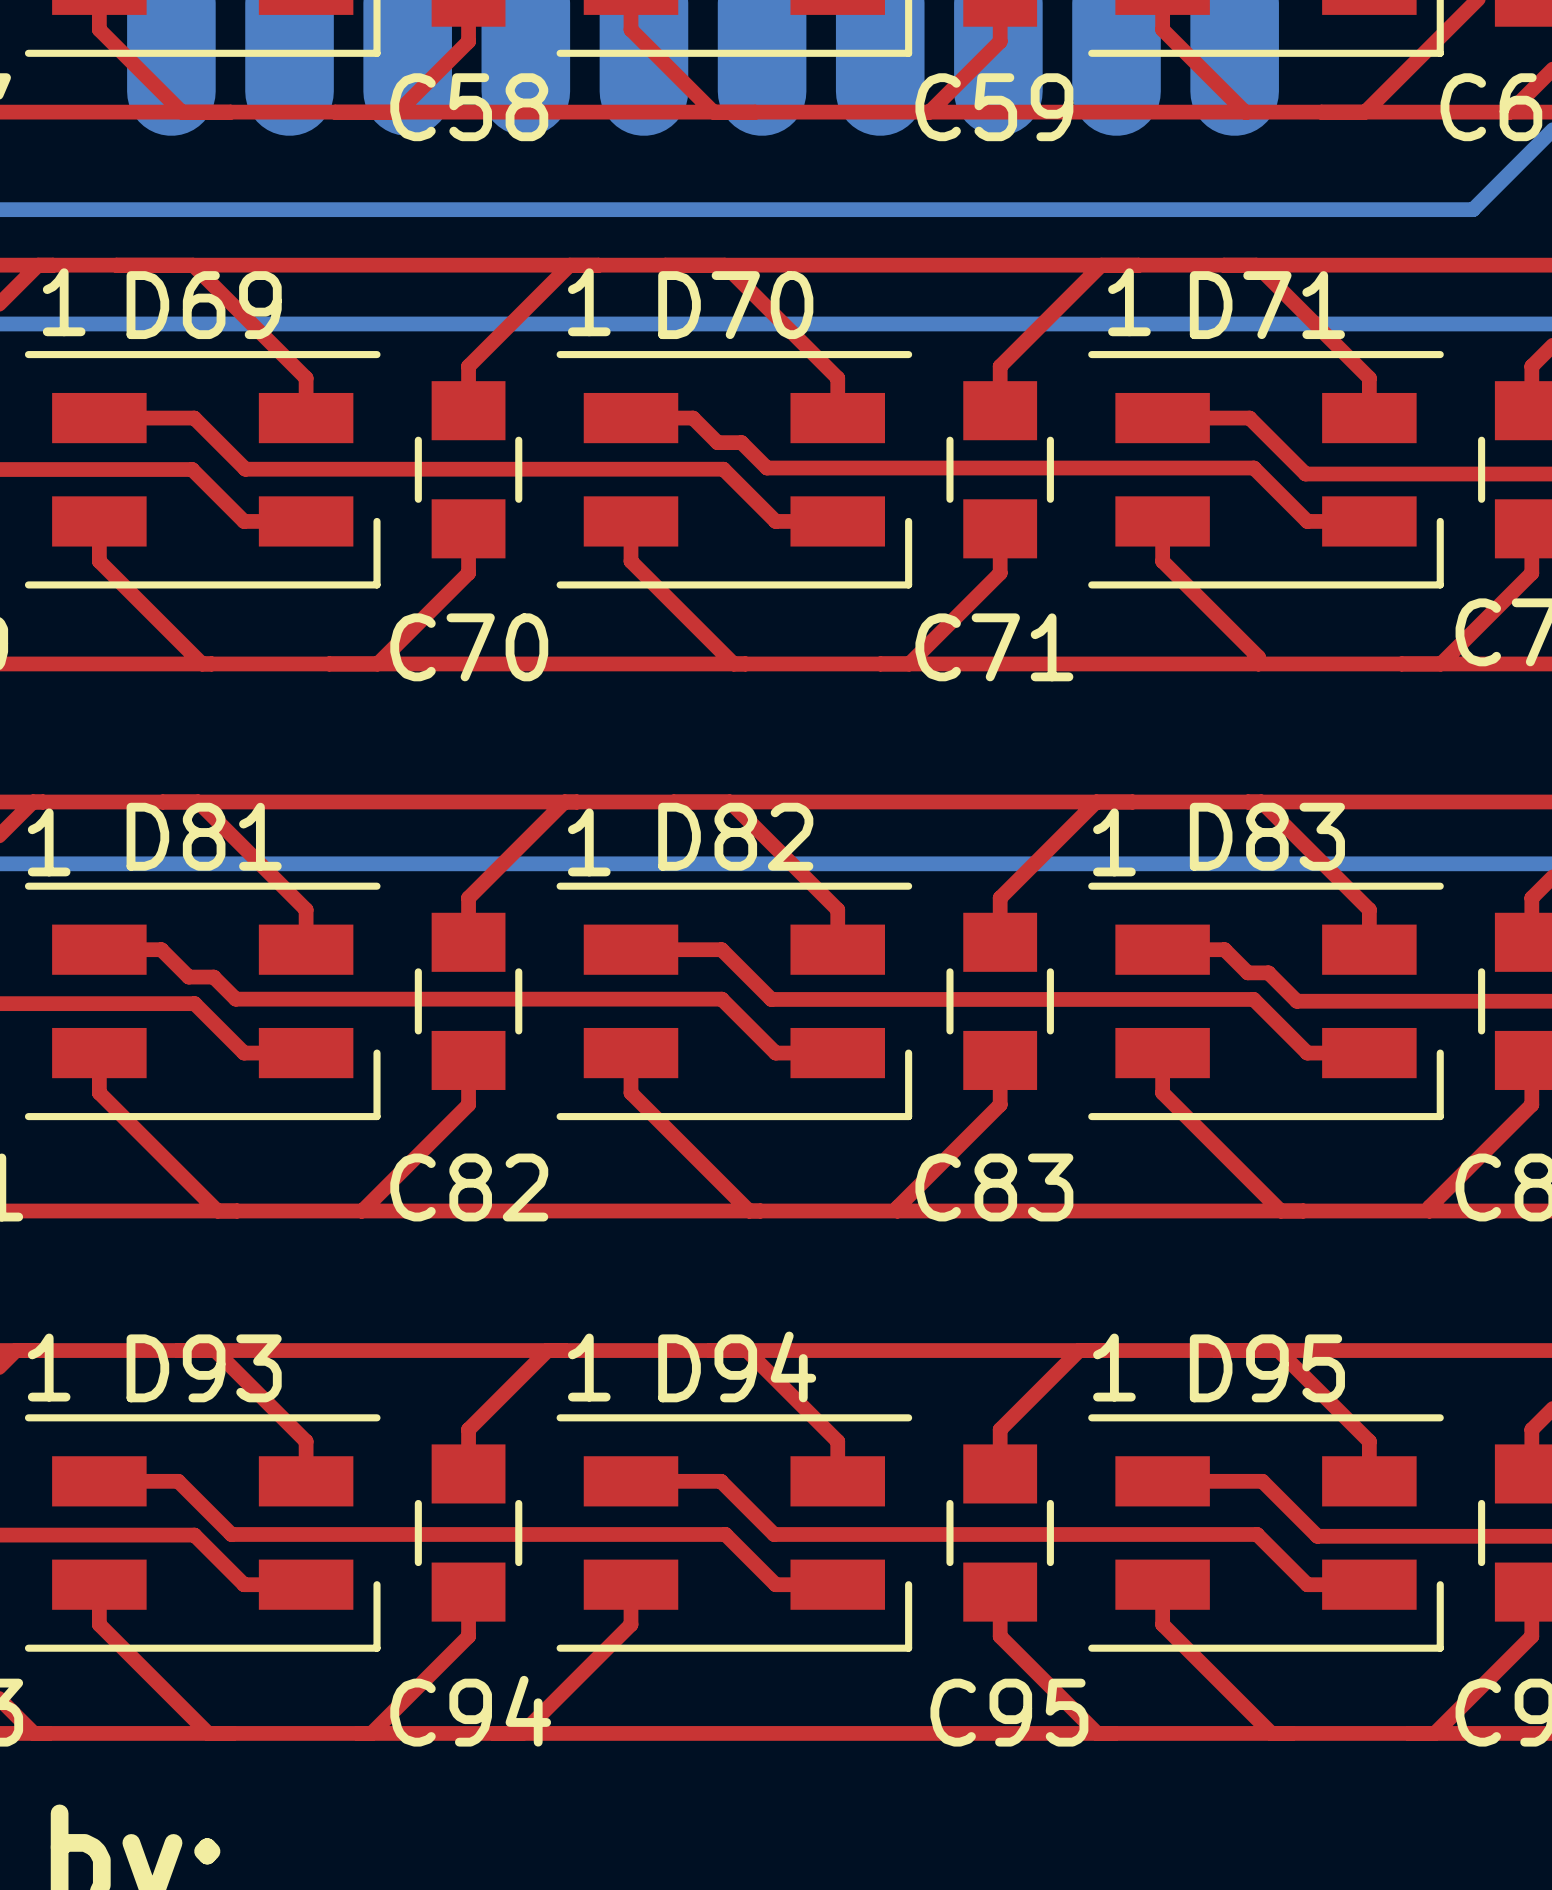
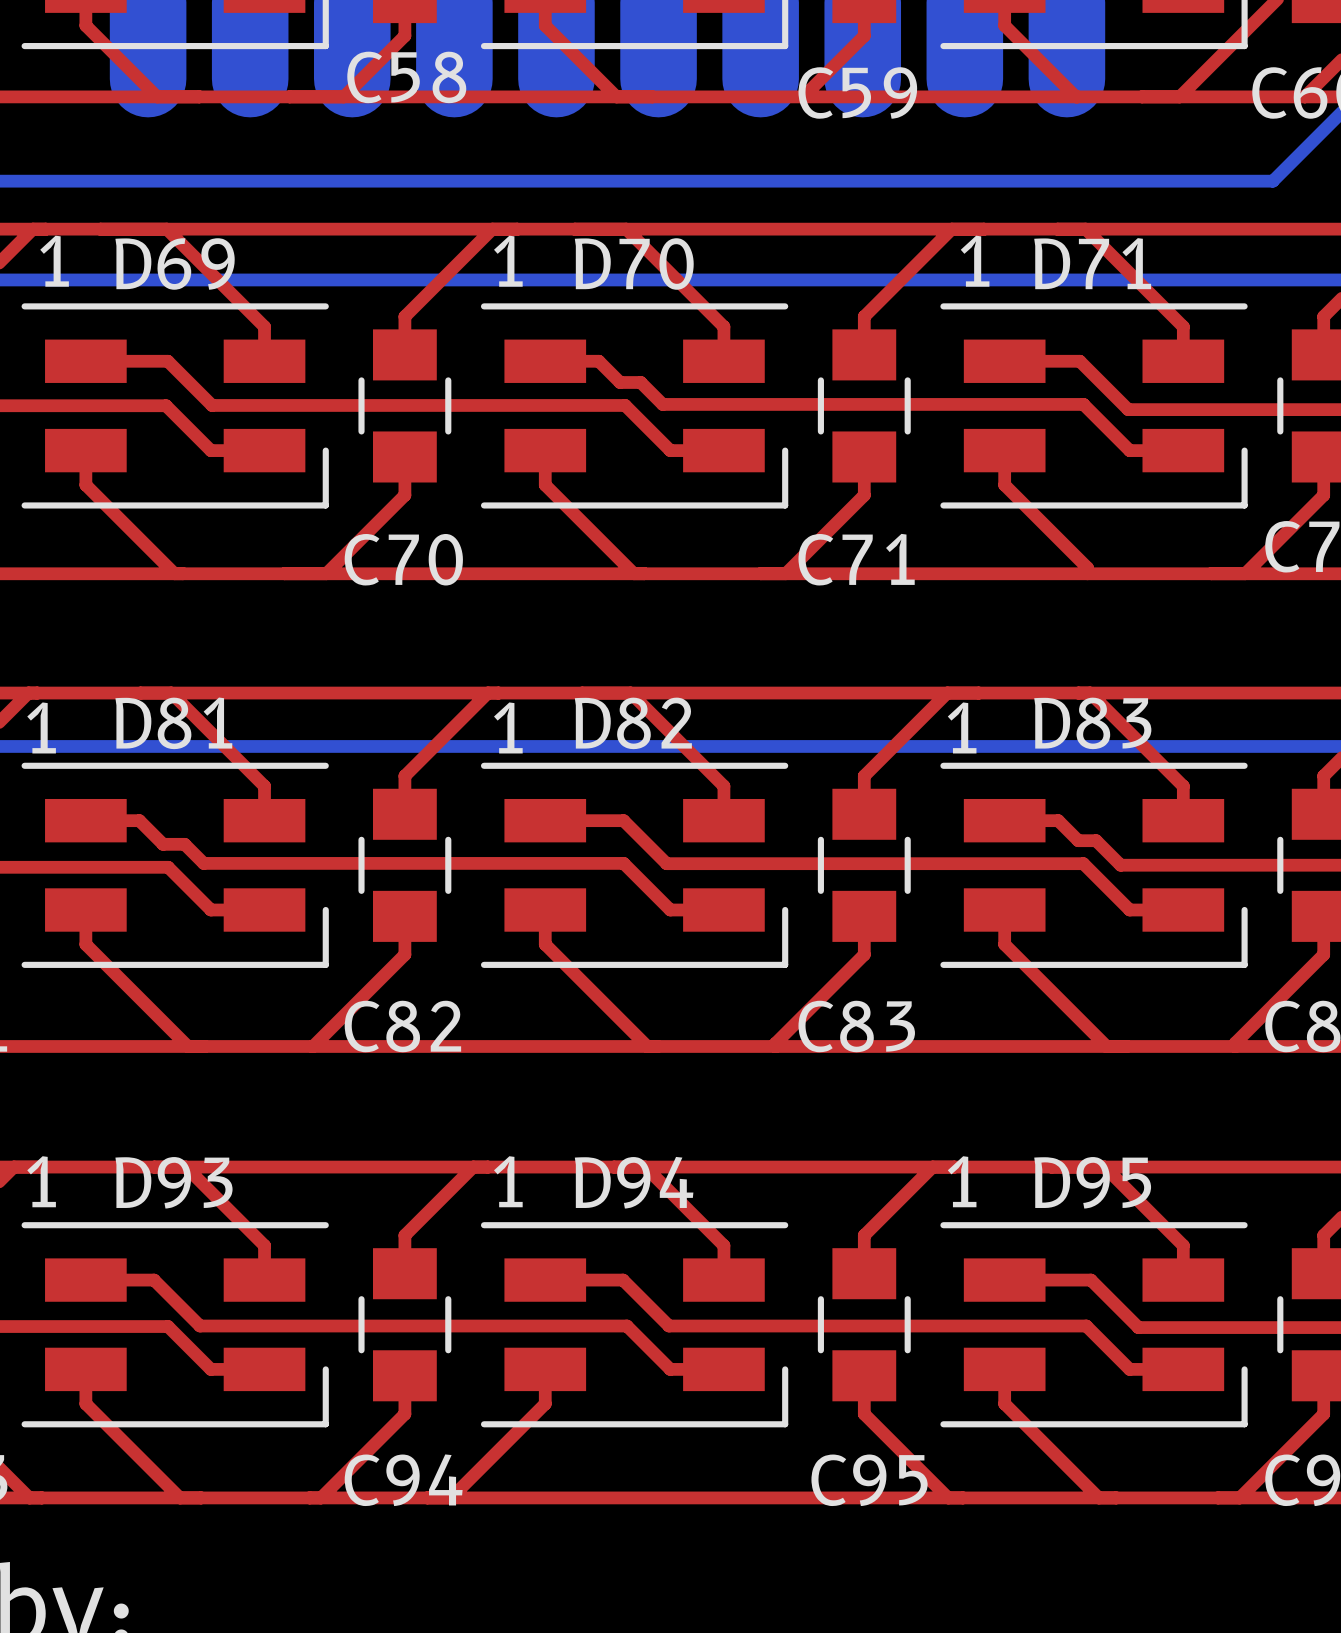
C58 name position: C58 (469, 107) -> C58 (406, 77)

